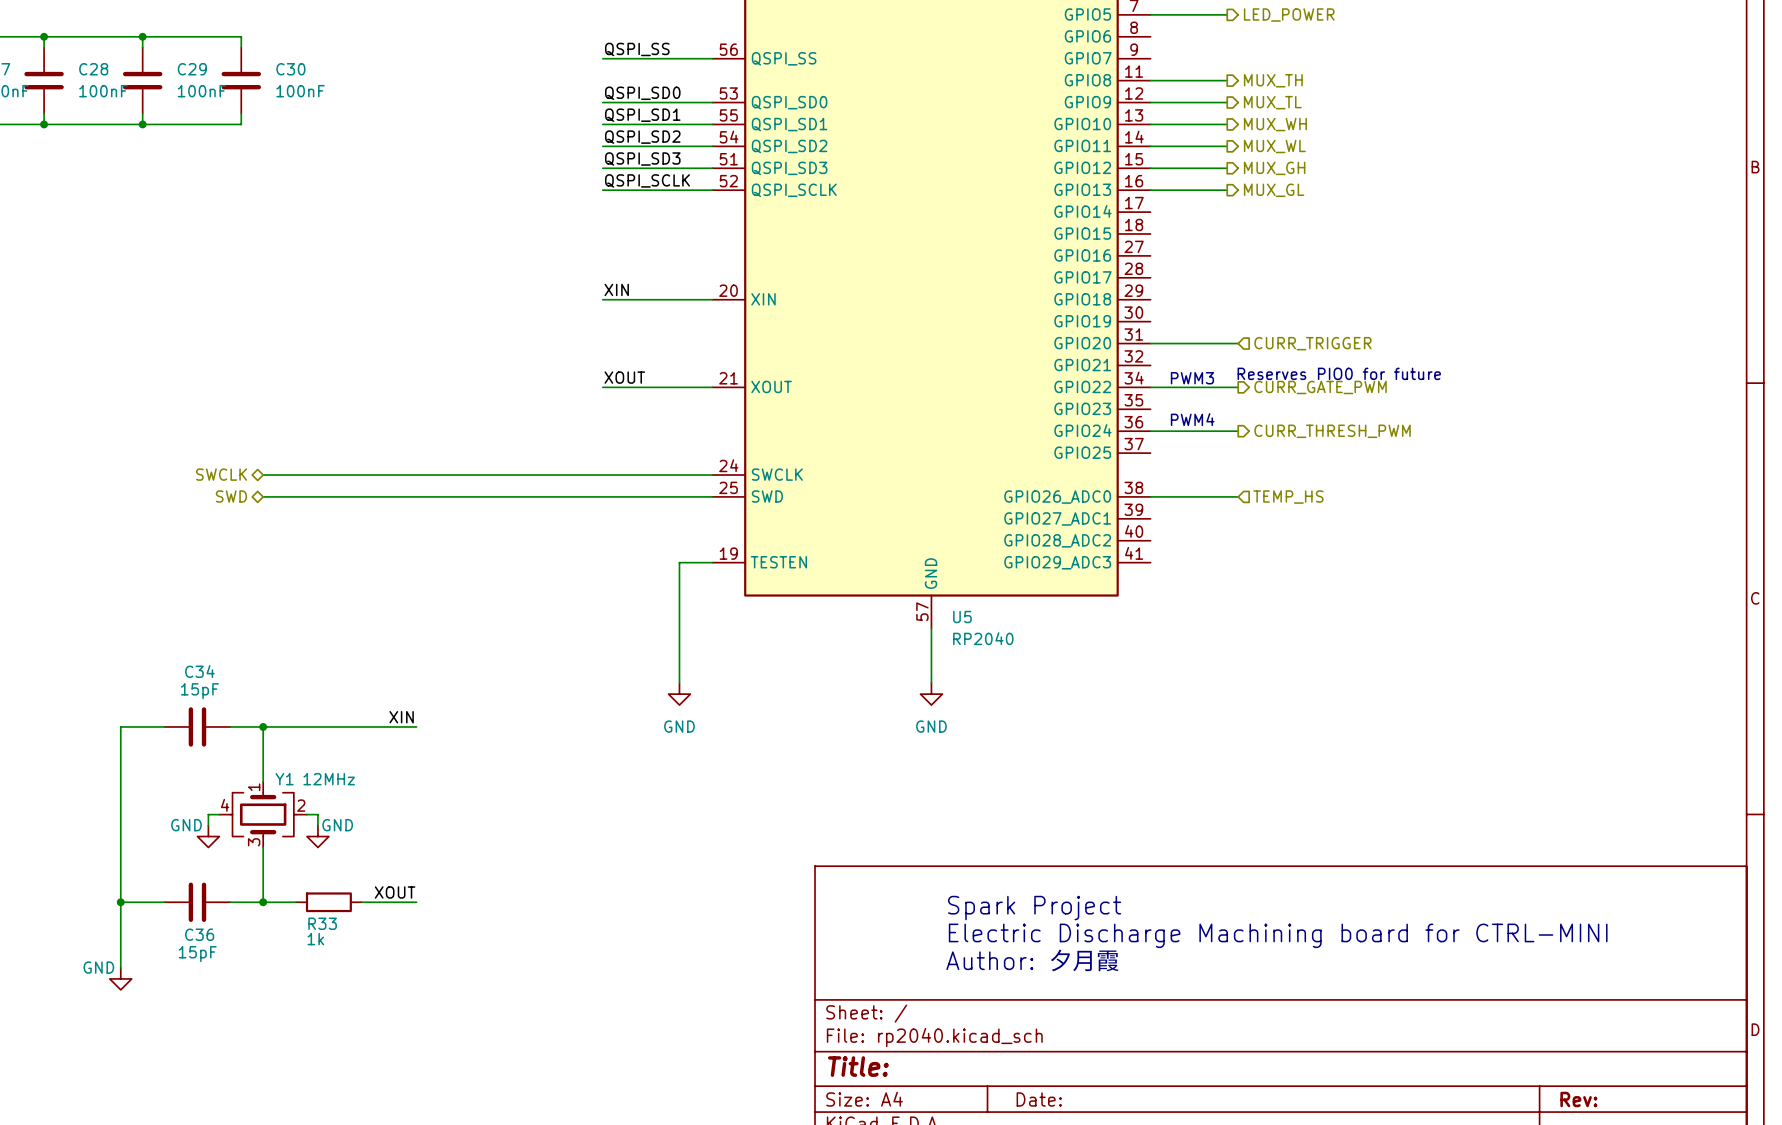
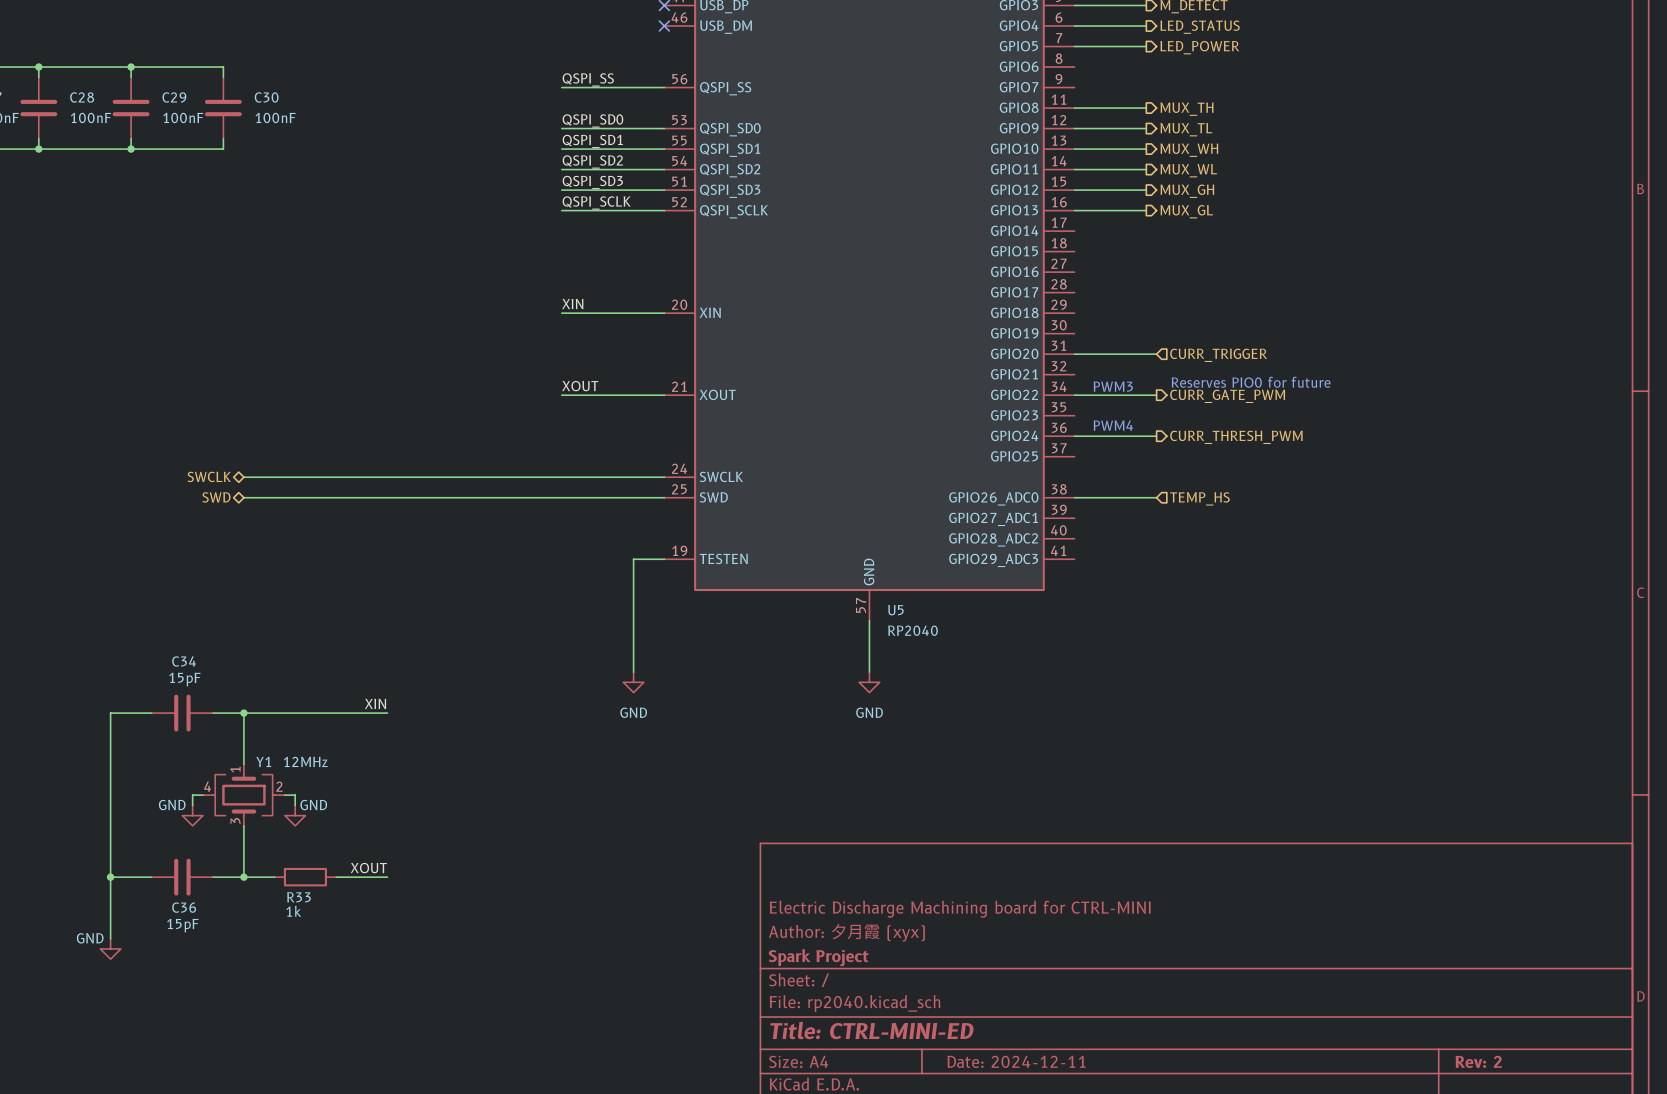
text: Spark Project (1034, 908) -> none
text: Electric Discharge Machining board for CTRL-MINI (1278, 935) -> none
title block: none -> Electric Discharge Machining board for CTRL-MINI (960, 909)
text: Author: 夕月霞 (1032, 960) -> none
title block: none -> Author: 夕月霞 (xyx) (846, 932)
title block: none -> Spark Project (818, 957)
title block: Title: (858, 1066) -> Title: CTRL-MINI-ED (872, 1030)
title block: Date: (1039, 1099) -> Date: 2024-12-11 (1016, 1061)
title block: Rev: (1578, 1099) -> Rev: 2 (1478, 1061)

